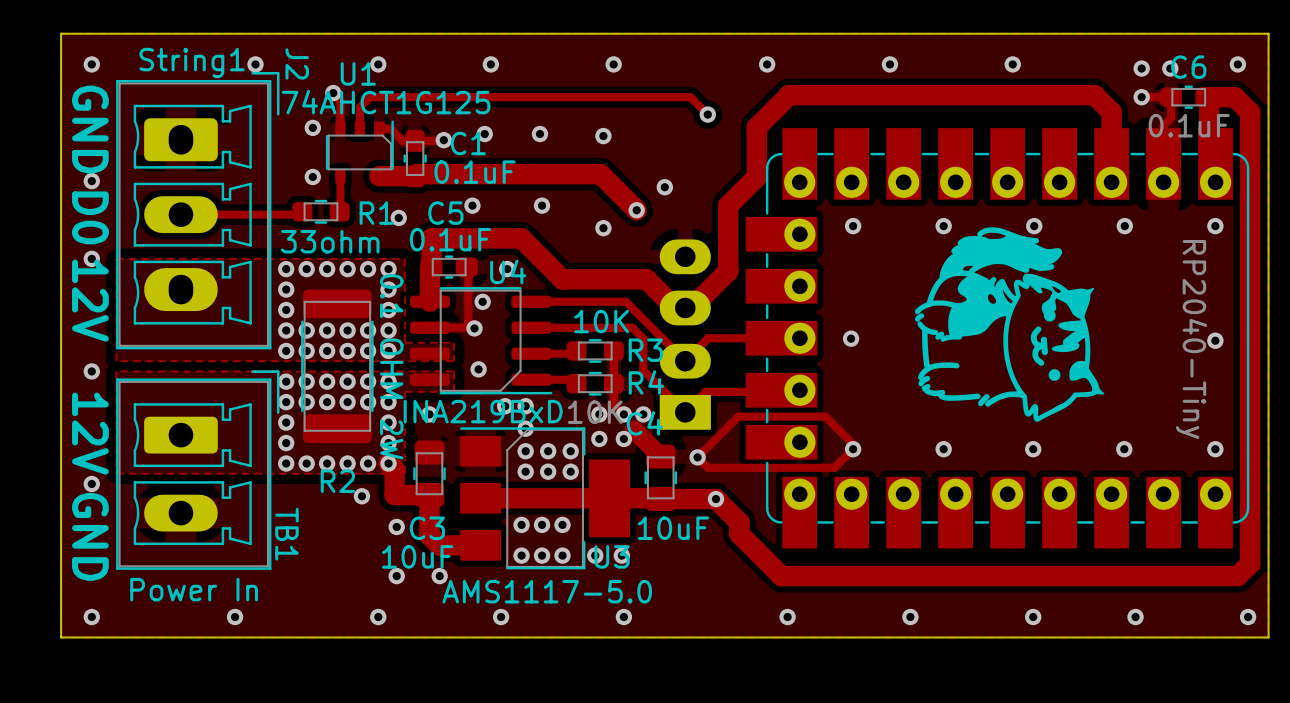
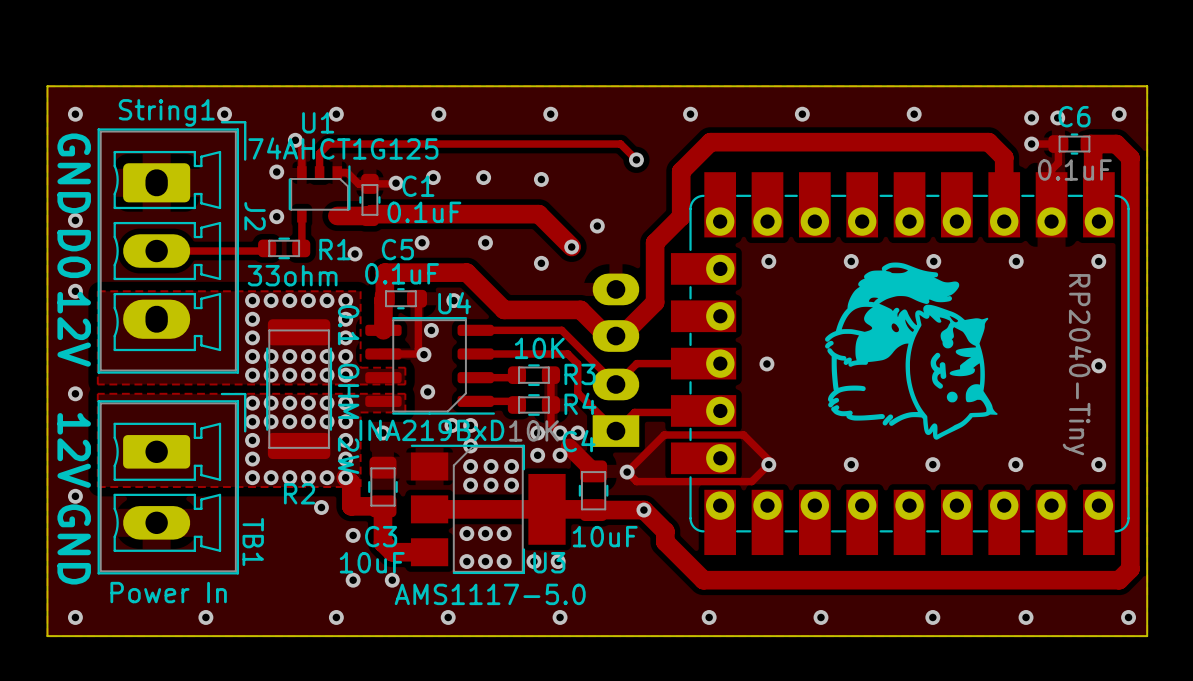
J2 name position: J2 (297, 63) -> J2 (255, 216)

